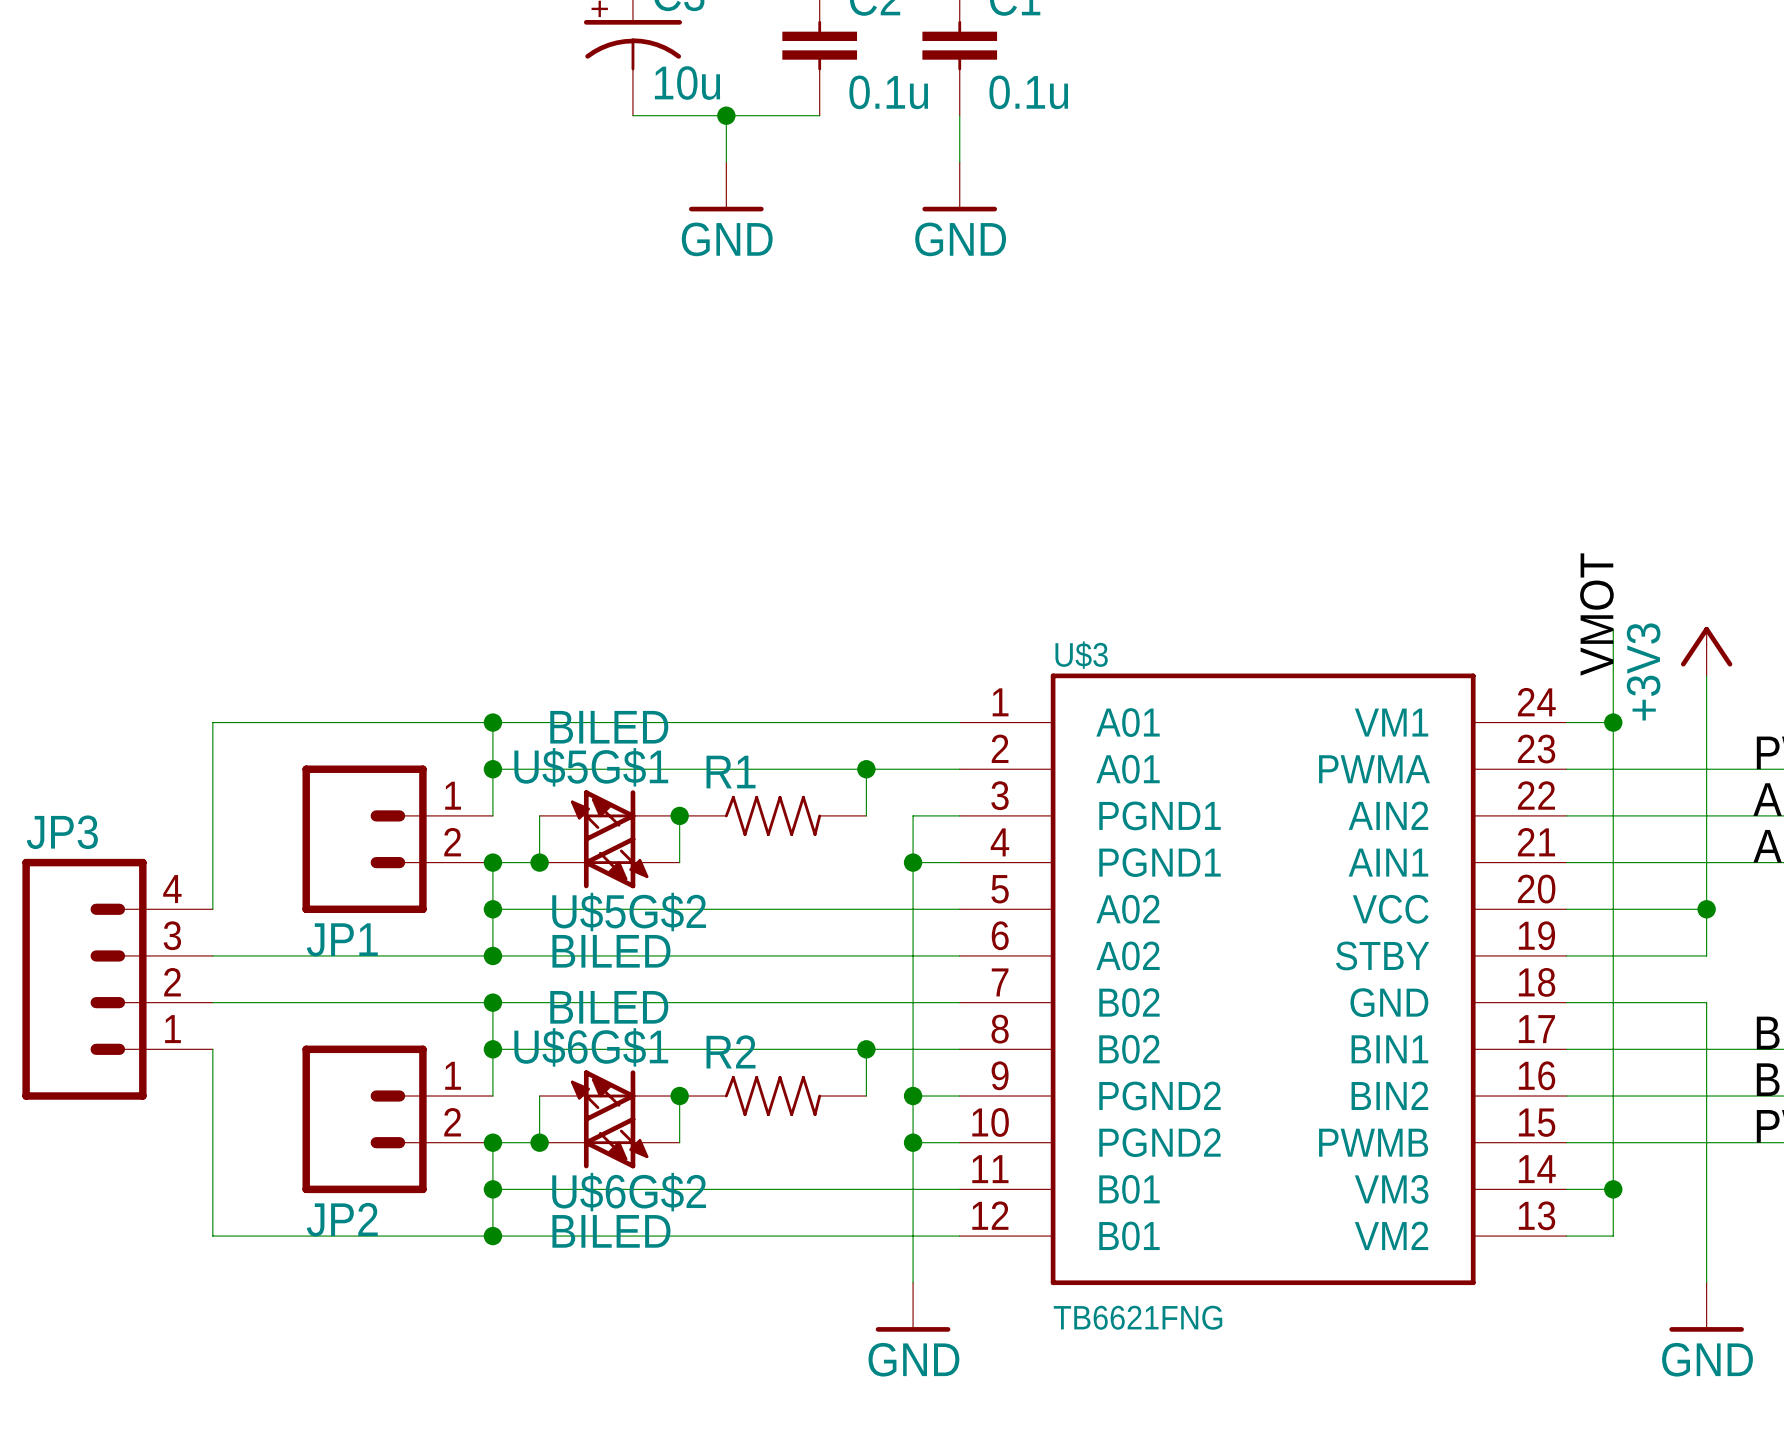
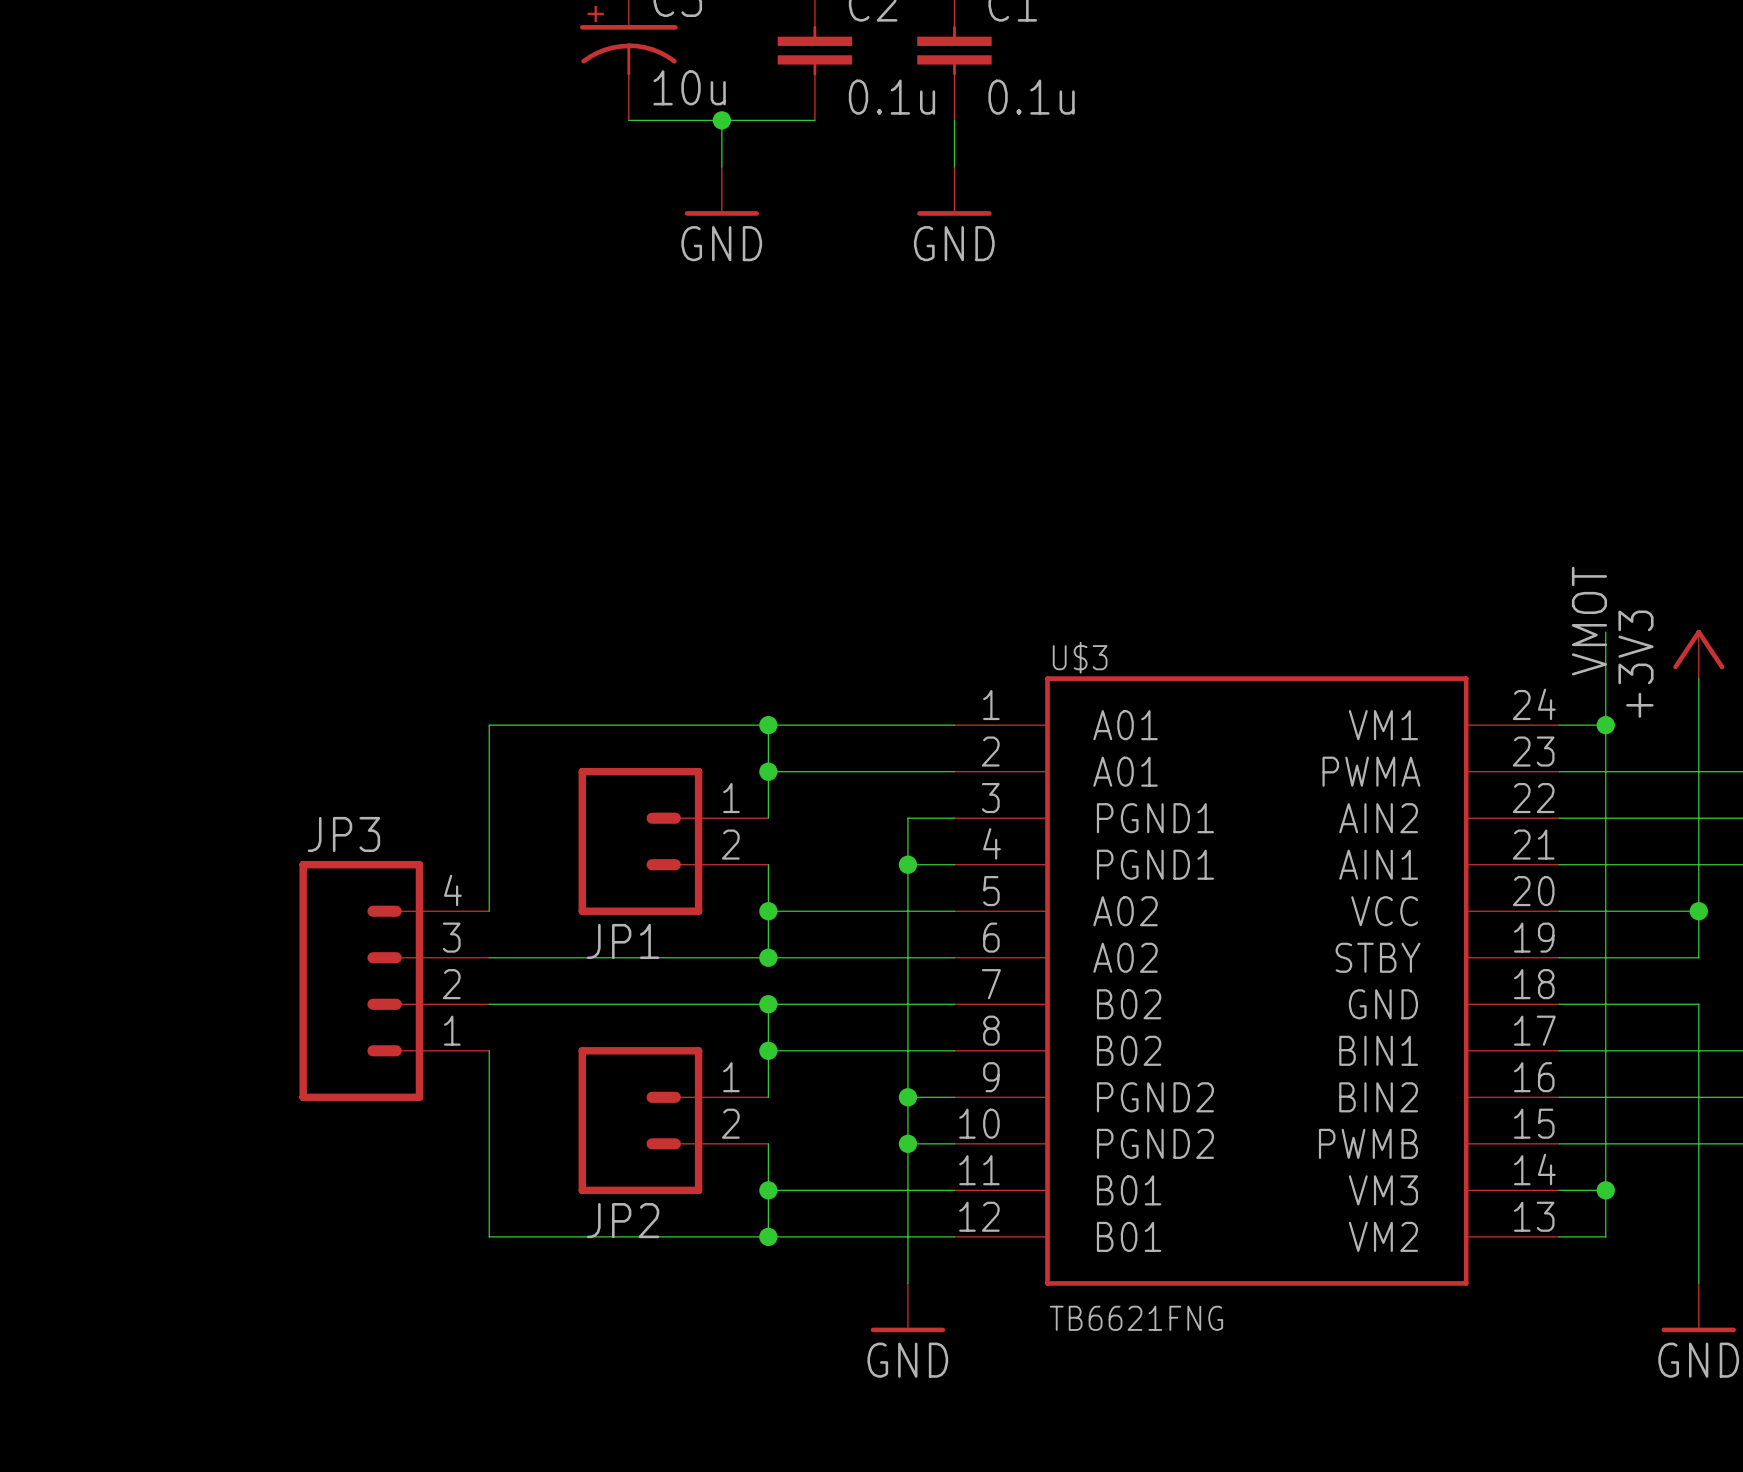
wire: (492, 722) (212, 722) (212, 909) -> none
junction: (492, 722) -> none
wire: none -> (768, 725) (768, 818)
junction: none -> (768, 725)
wire: (492, 769) (773, 769) -> none
junction: (492, 769) -> none
junction: none -> (768, 771)
wire: (866, 769) (866, 815) -> none
junction: (866, 769) -> none
wire: (539, 815) (539, 862) (492, 862) -> (489, 818) (489, 864)
wire: (679, 815) (679, 862) -> none
junction: (679, 815) -> none
R1: (773, 815) -> none
U$5G$1: BILED (609, 835) -> none
JP1 position: (397, 839) -> (673, 841)
U$5G$2: BILED (609, 843) -> none
junction: (492, 862) -> none
junction: (539, 862) -> none
wire: none -> (768, 864) (768, 957)
junction: (492, 909) -> none
wire: (773, 909) (492, 909) (492, 955) (212, 955) -> none
junction: none -> (768, 911)
junction: (492, 955) -> none
junction: none -> (768, 957)
JP3 position: (117, 979) -> (394, 981)
wire: (212, 1002) (492, 1002) (492, 1049) (773, 1049) -> none
junction: (492, 1002) -> none
wire: none -> (768, 1004) (768, 1097)
junction: none -> (768, 1004)
wire: (212, 1049) (212, 1236) (492, 1236) -> none
junction: (492, 1049) -> none
junction: none -> (768, 1050)
wire: (866, 1049) (866, 1096) -> none
junction: (866, 1049) -> none
wire: (539, 1096) (539, 1142) (492, 1142) -> (489, 1097) (489, 1143)
wire: (679, 1096) (679, 1142) -> none
junction: (679, 1096) -> none
R2: (773, 1096) -> none
U$6G$1: BILED (609, 1115) -> none
JP2 position: (397, 1119) -> (673, 1120)
U$6G$2: BILED (609, 1123) -> none
junction: (492, 1142) -> none
junction: (539, 1142) -> none
wire: none -> (768, 1143) (768, 1236)
wire: (492, 1189) (773, 1189) -> none
junction: (492, 1189) -> none
junction: none -> (768, 1190)
junction: (492, 1236) -> none
junction: none -> (768, 1236)

